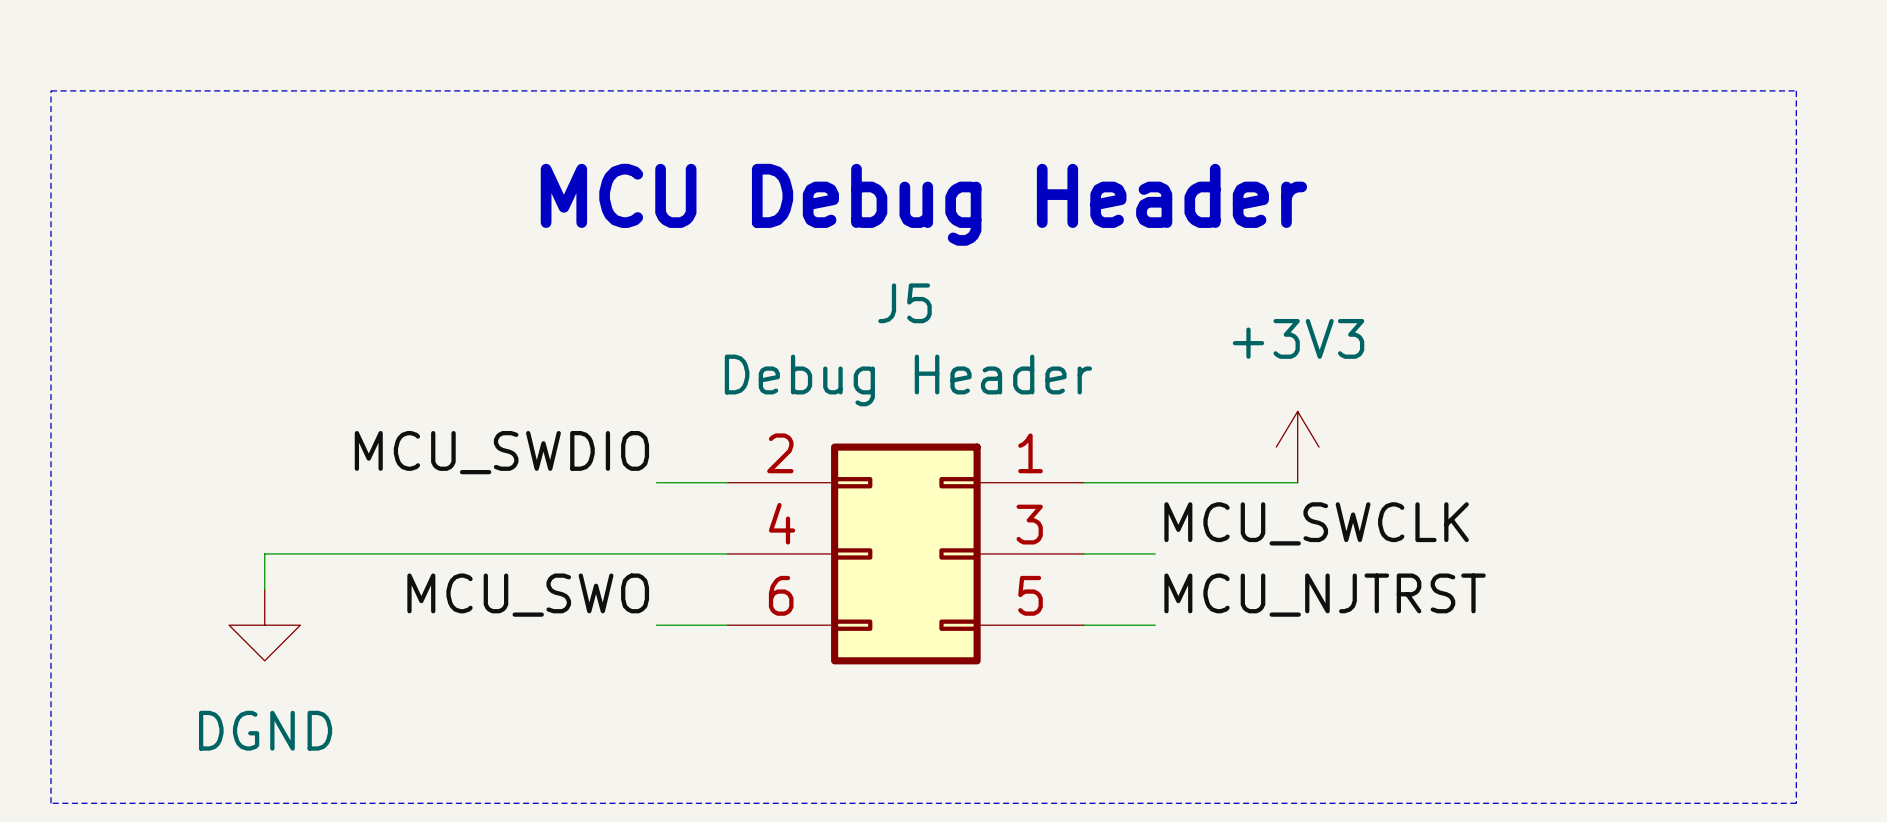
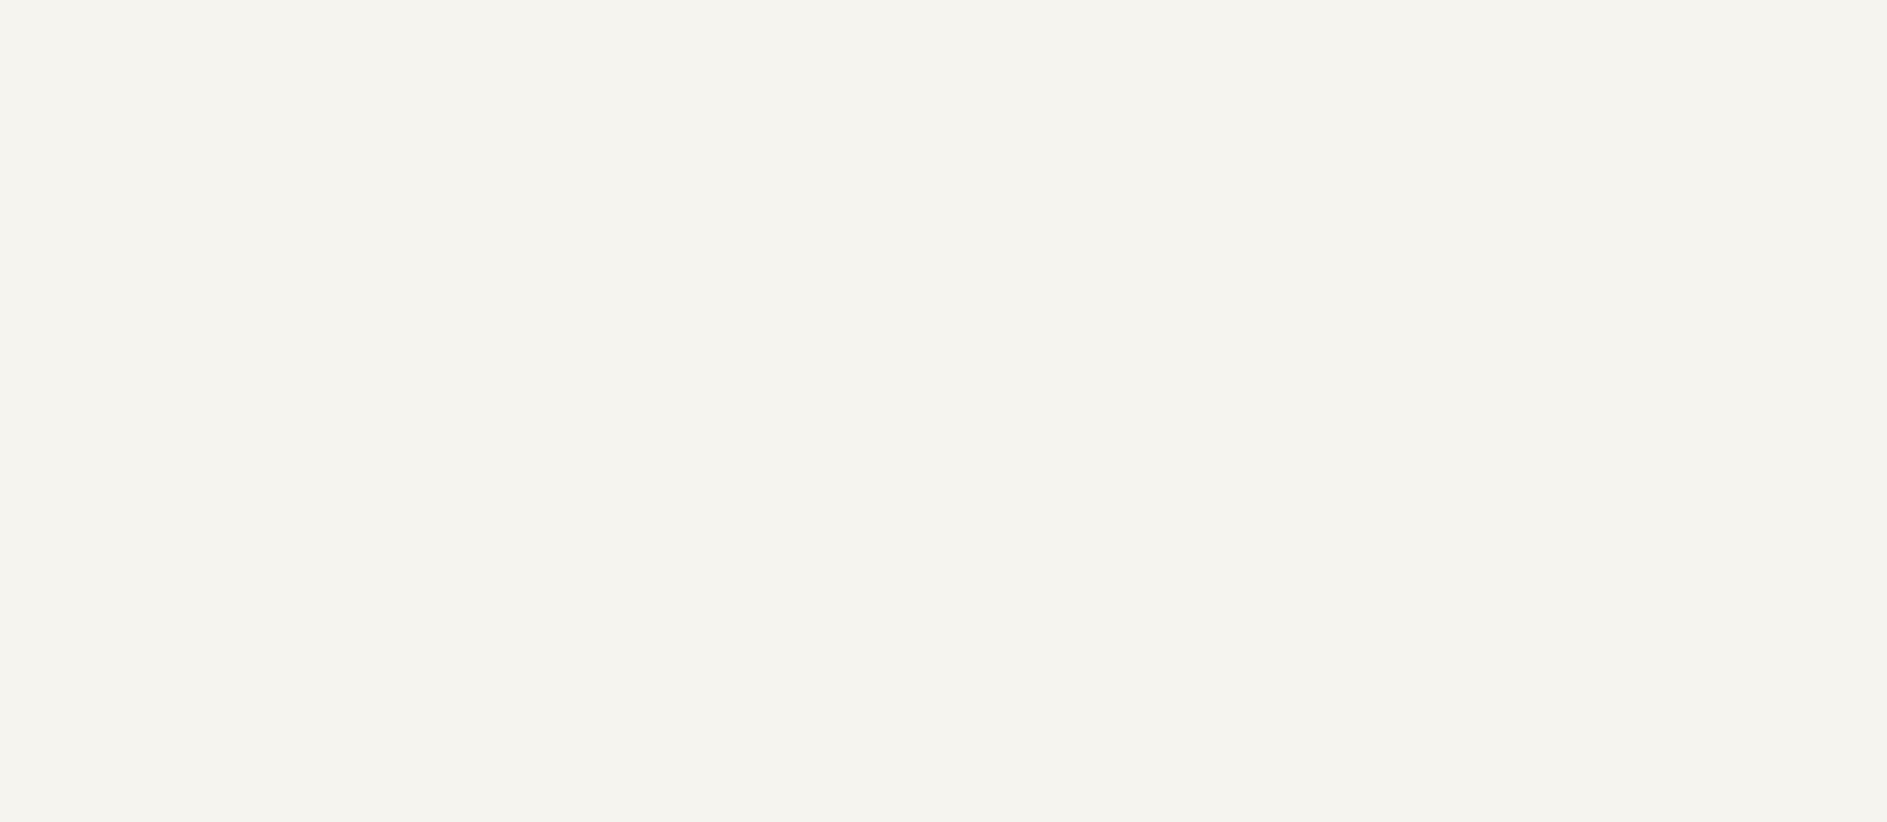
line: (51, 90) (1796, 90) (1796, 803) (51, 803) (51, 90) -> none
text: MCU Debug Header (923, 204) -> none
power symbol: +3V3 (1297, 447) -> none
label: MCU_SWDIO (501, 452) -> none
wire: (656, 482) (727, 482) -> none
wire: (1083, 482) (1297, 482) -> none
label: MCU_SWCLK (1316, 523) -> none
wire: (727, 553) (264, 553) (264, 589) -> none
J5: Debug Header (905, 553) -> none
wire: (1083, 553) (1155, 553) -> none
label: MCU_SWO (528, 595) -> none
label: MCU_NJTRST (1325, 595) -> none
power symbol: DGND (264, 625) -> none
wire: (656, 625) (727, 625) -> none
wire: (1083, 625) (1155, 625) -> none

